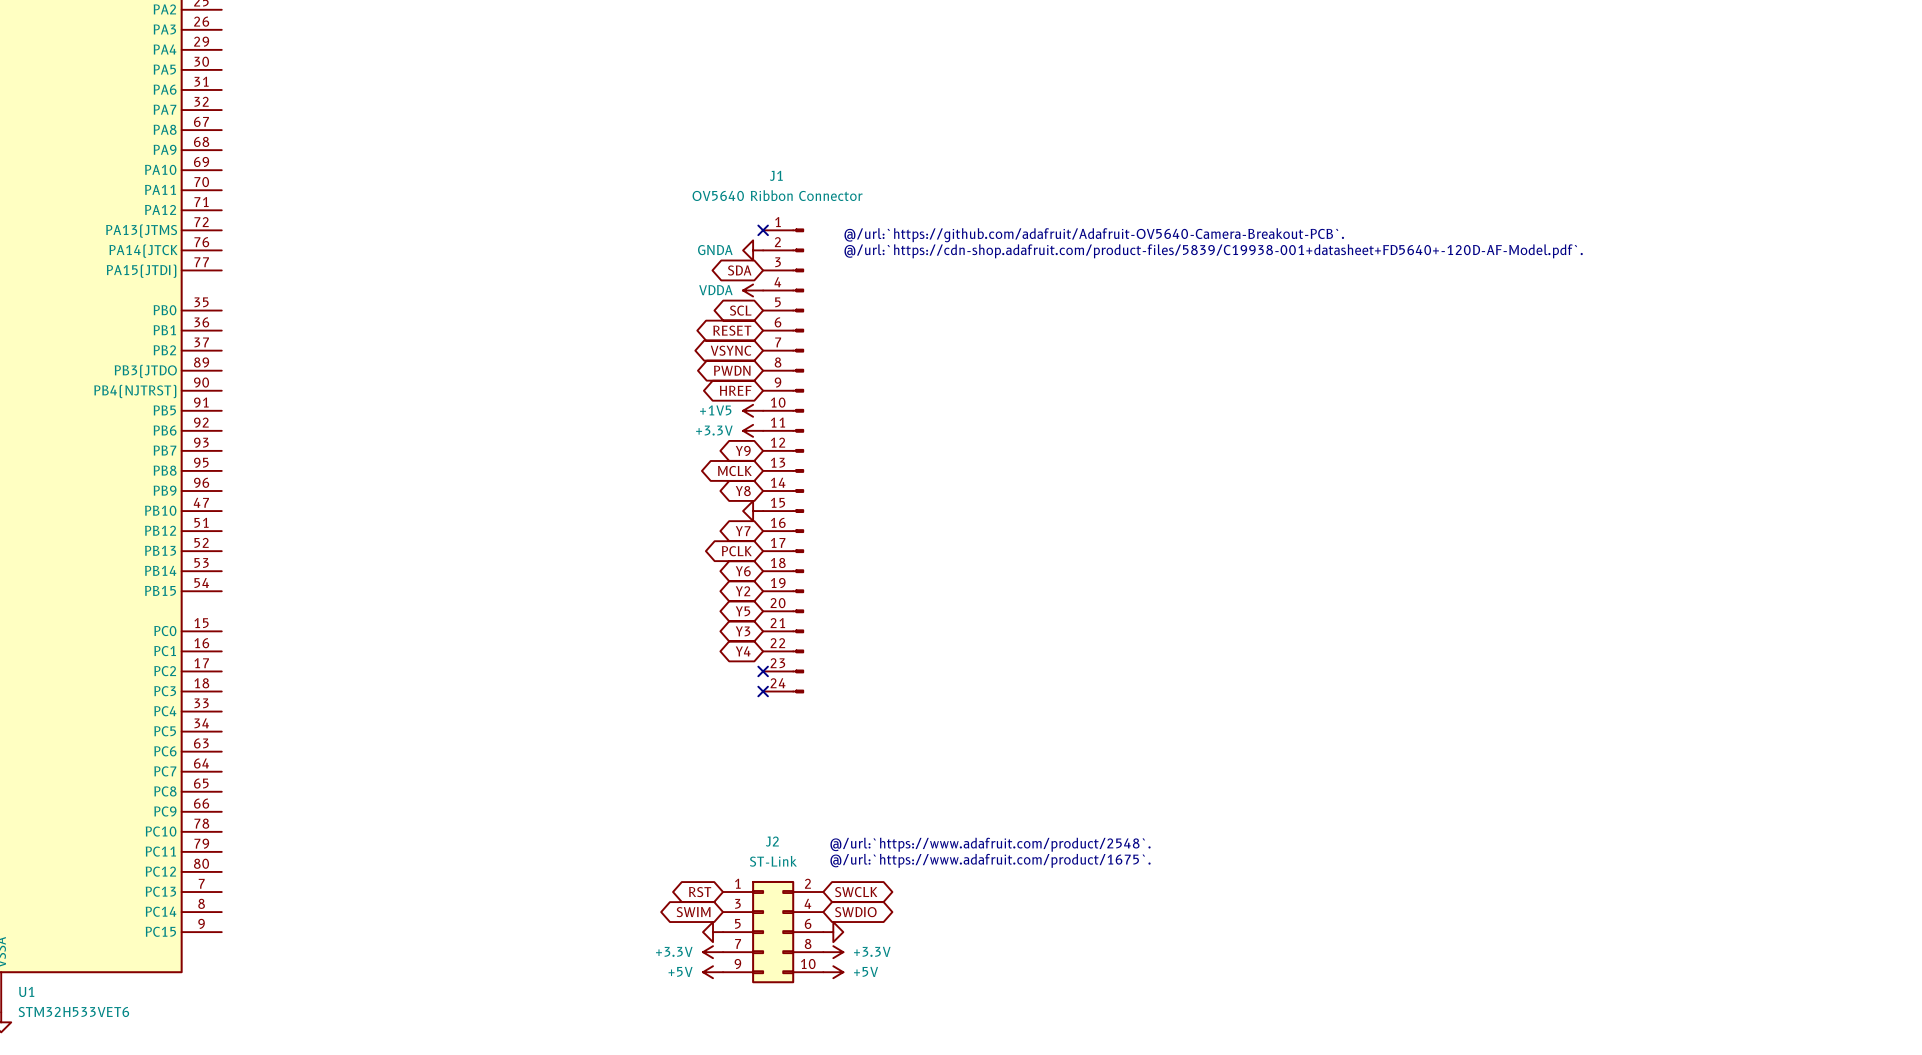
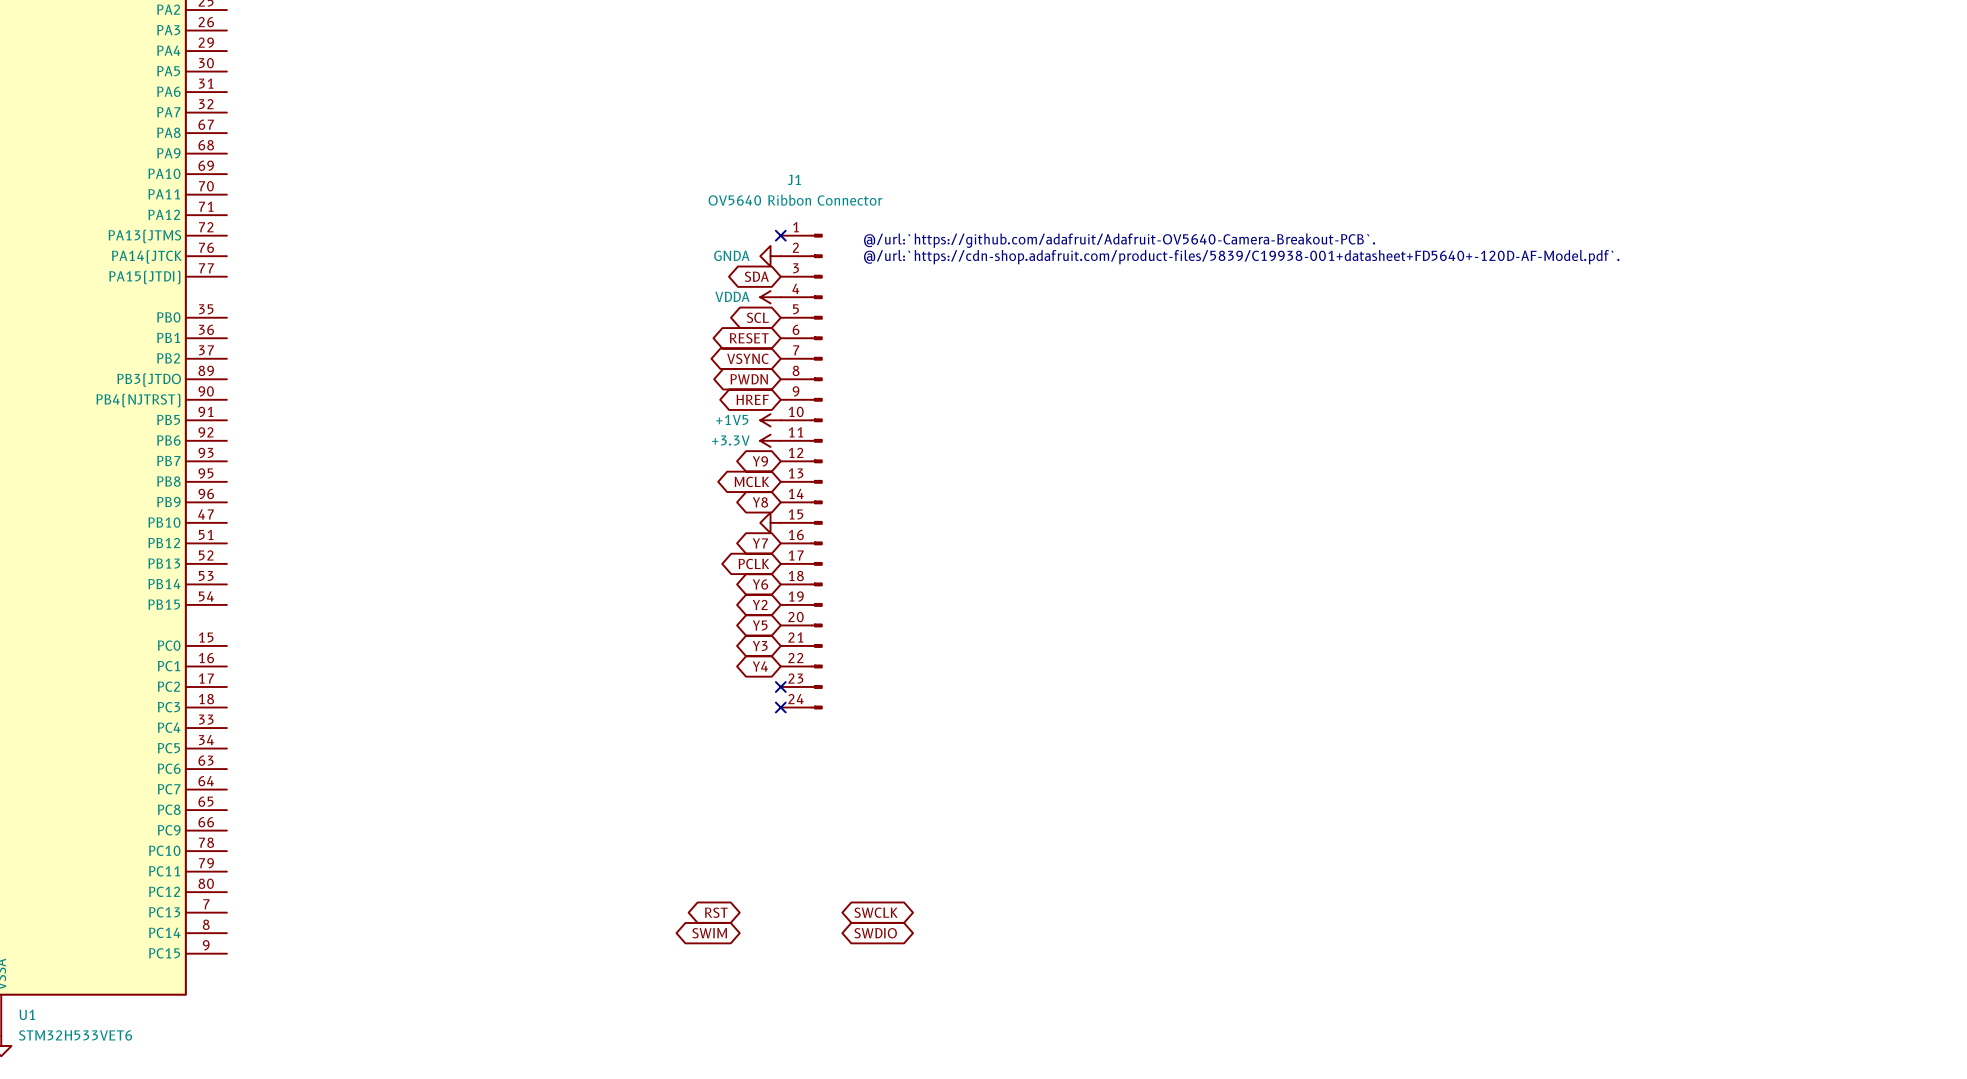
text: @/url:`https://www.adafruit.com/product/2548`. (990, 844) -> none
text: @/url:`https://www.adafruit.com/product/1675`. (990, 860) -> none
power symbol: (713, 932) -> none
J2: ST-Link (773, 932) -> none
power symbol: (833, 932) -> none
power symbol: +3.3V (713, 952) -> none
power symbol: +3.3V (833, 952) -> none
power symbol: +5V (713, 972) -> none
power symbol: +5V (833, 972) -> none

